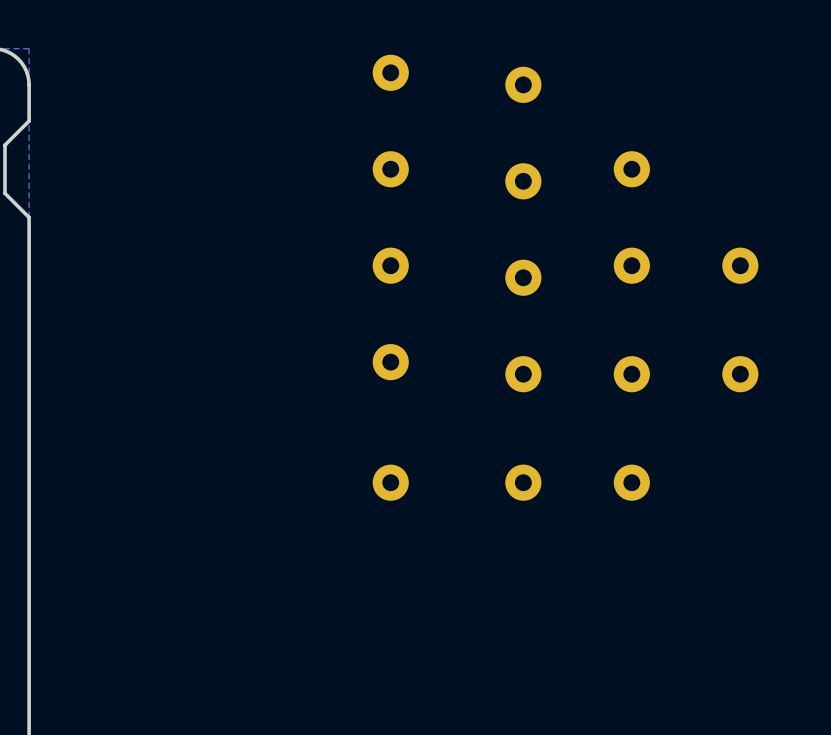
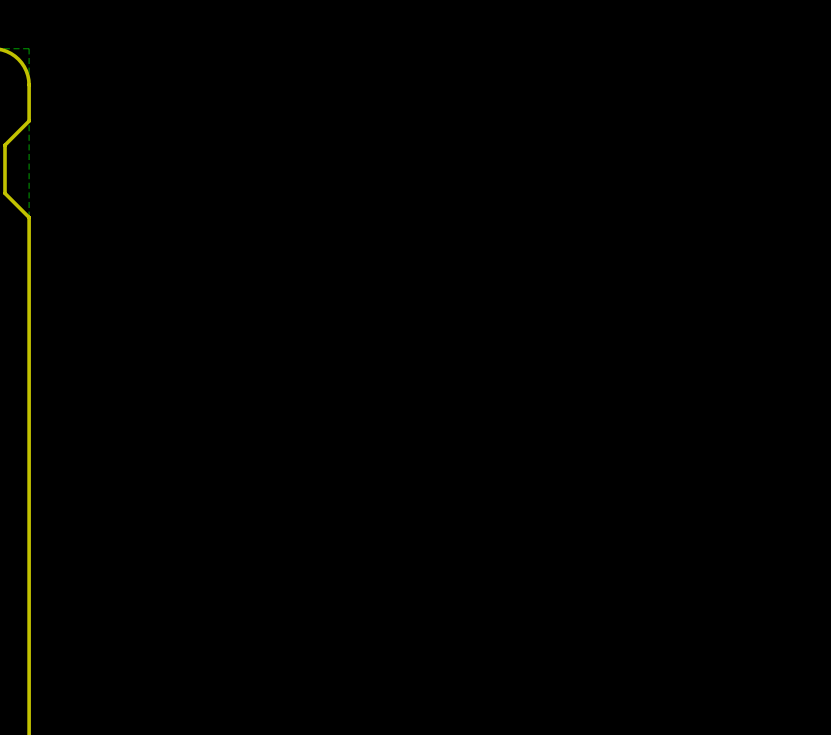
part: (390, 72) -> none
part: (523, 84) -> none
part: (390, 169) -> none
part: (631, 169) -> none
part: (523, 181) -> none
part: (390, 265) -> none
part: (631, 265) -> none
part: (740, 265) -> none
part: (523, 277) -> none
part: (390, 362) -> none
part: (523, 374) -> none
part: (631, 374) -> none
part: (740, 374) -> none
part: (390, 482) -> none
part: (523, 482) -> none
part: (631, 482) -> none

